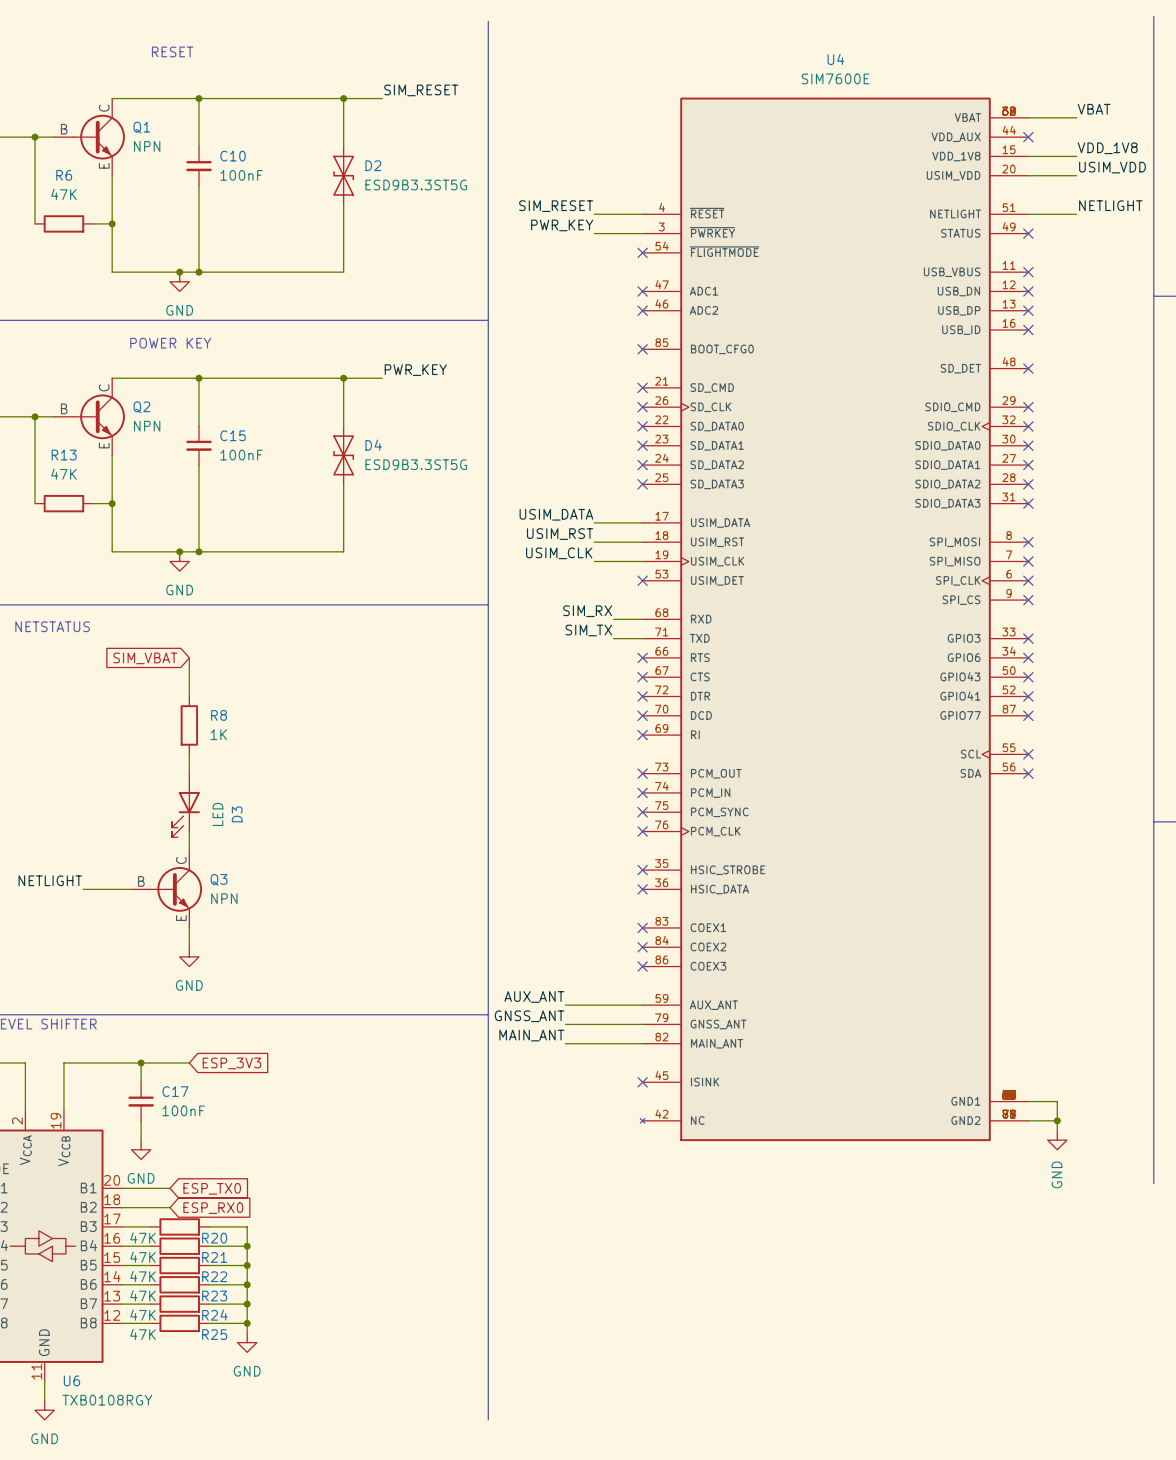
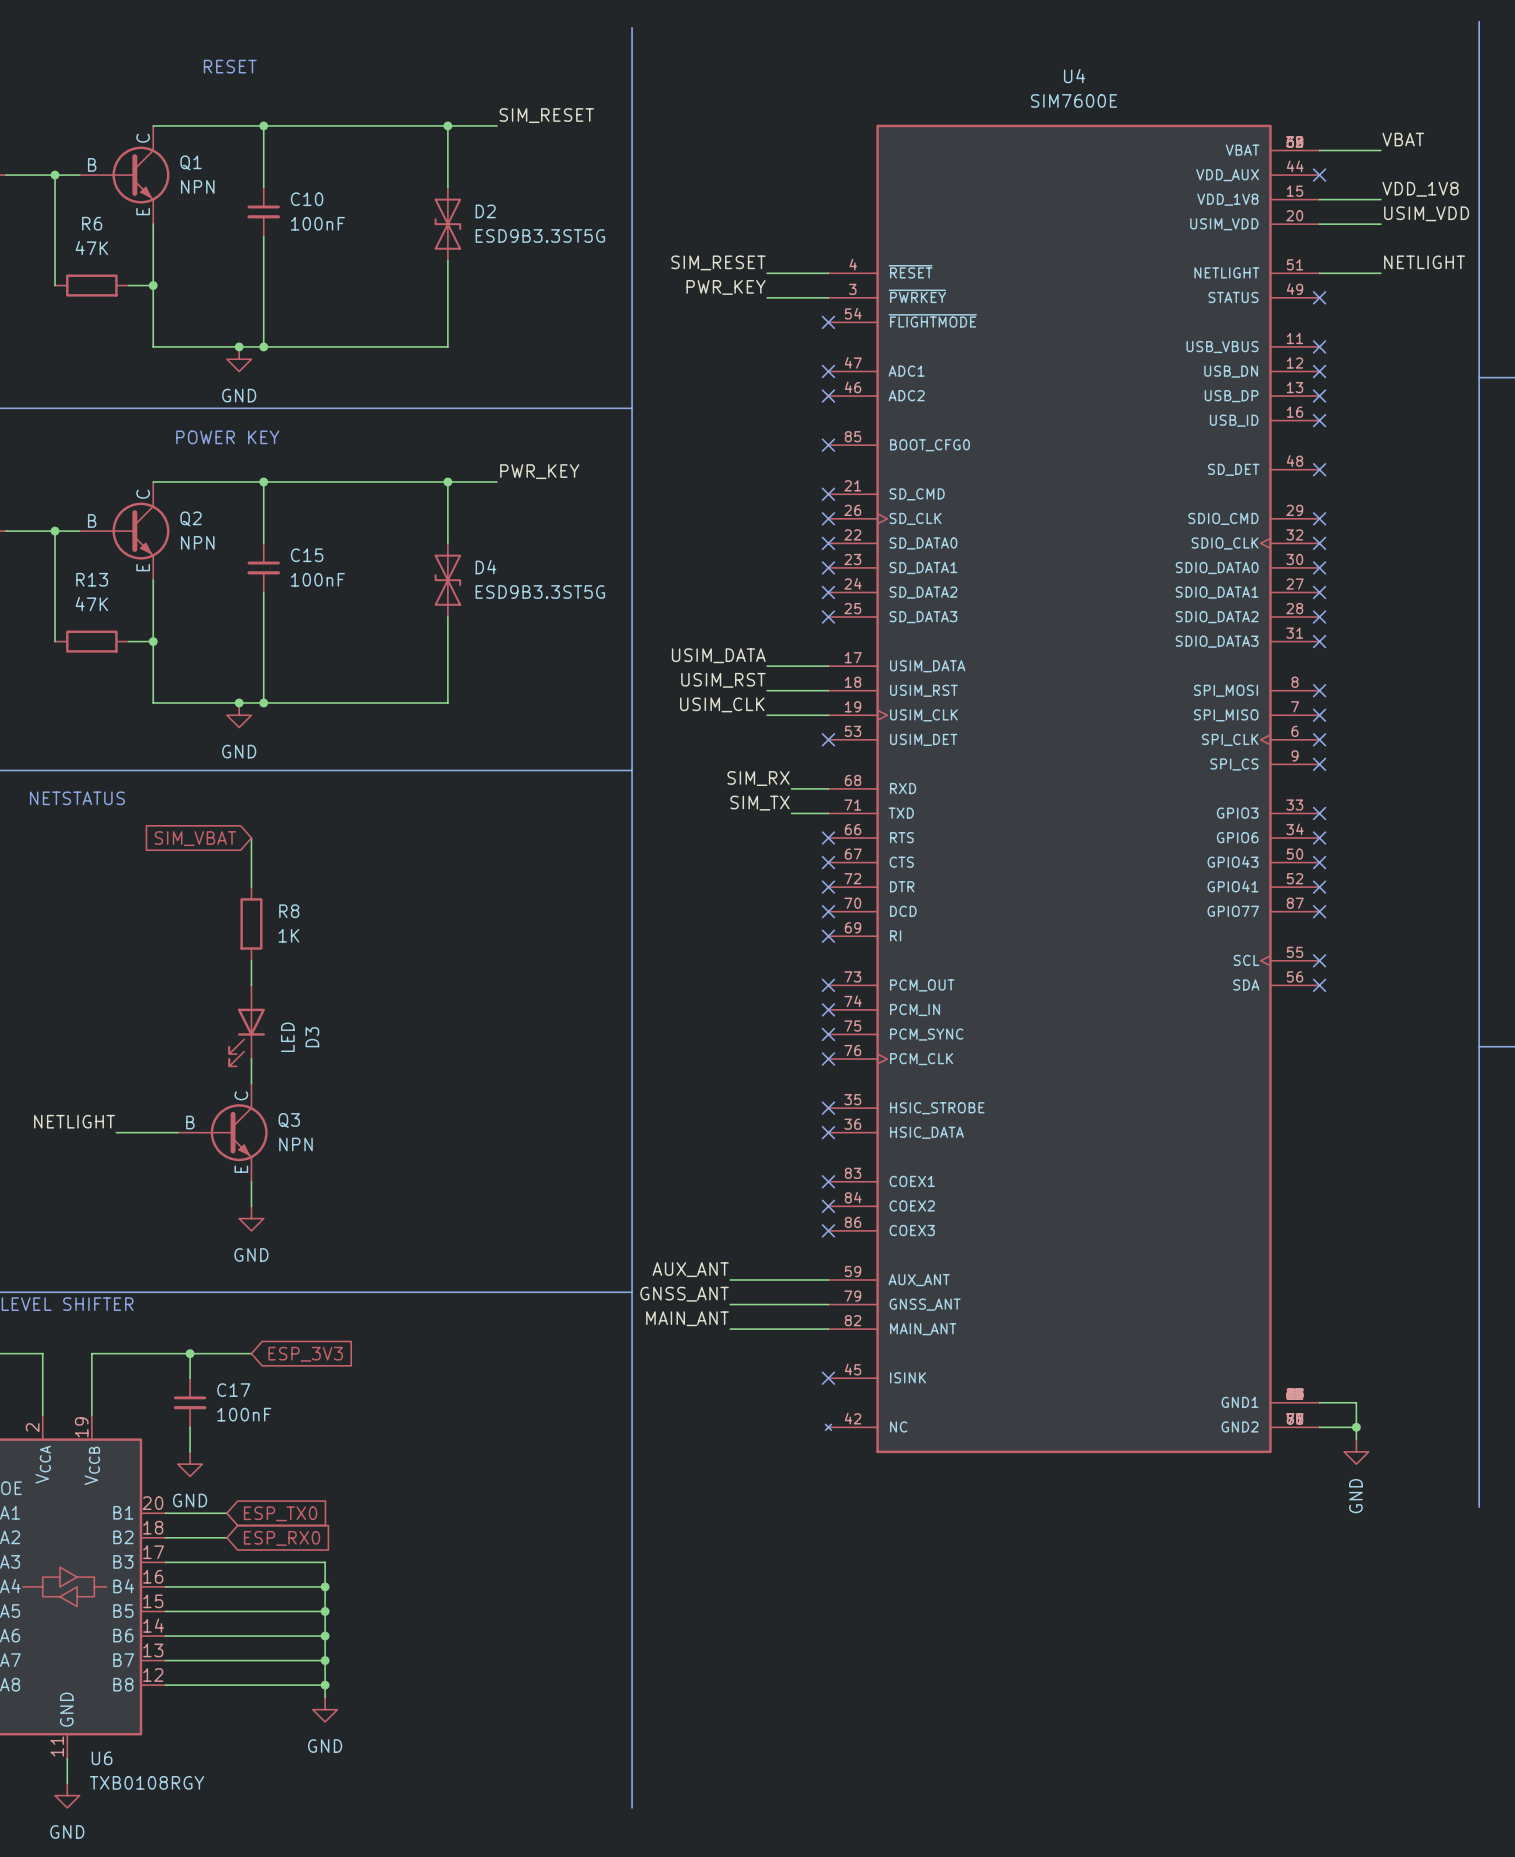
wire: none -> (202, 1562) (276, 1562)
R20: 47K (179, 1226) -> none
wire: none -> (202, 1586) (276, 1586)
R21: 47K (179, 1246) -> none
wire: none -> (202, 1611) (276, 1611)
R22: 47K (179, 1265) -> none
wire: none -> (202, 1636) (276, 1636)
R23: 47K (179, 1284) -> none
wire: none -> (202, 1660) (276, 1660)
R24: 47K (179, 1304) -> none
wire: none -> (202, 1685) (276, 1685)
R25: 47K (179, 1323) -> none

